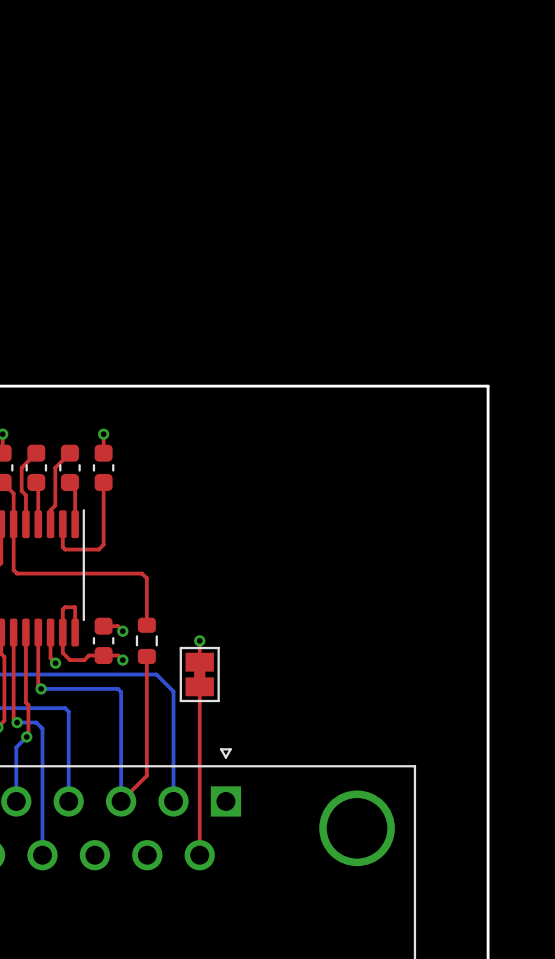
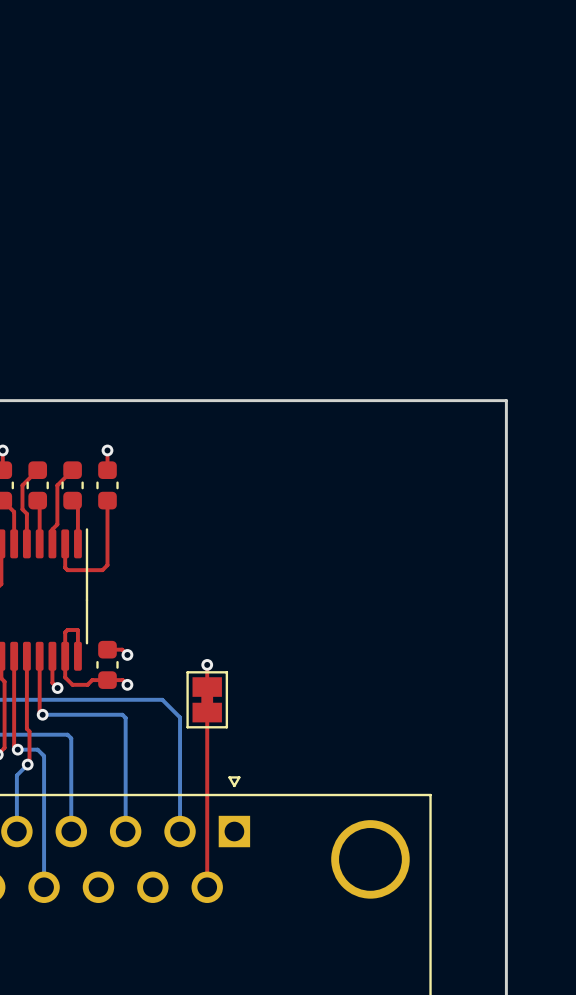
top track: (13, 524) (13, 570) (17, 573) (142, 573) (146, 578) (146, 625) -> none
part: (146, 640) -> none
top track: (146, 656) (146, 775) (121, 801) -> none

